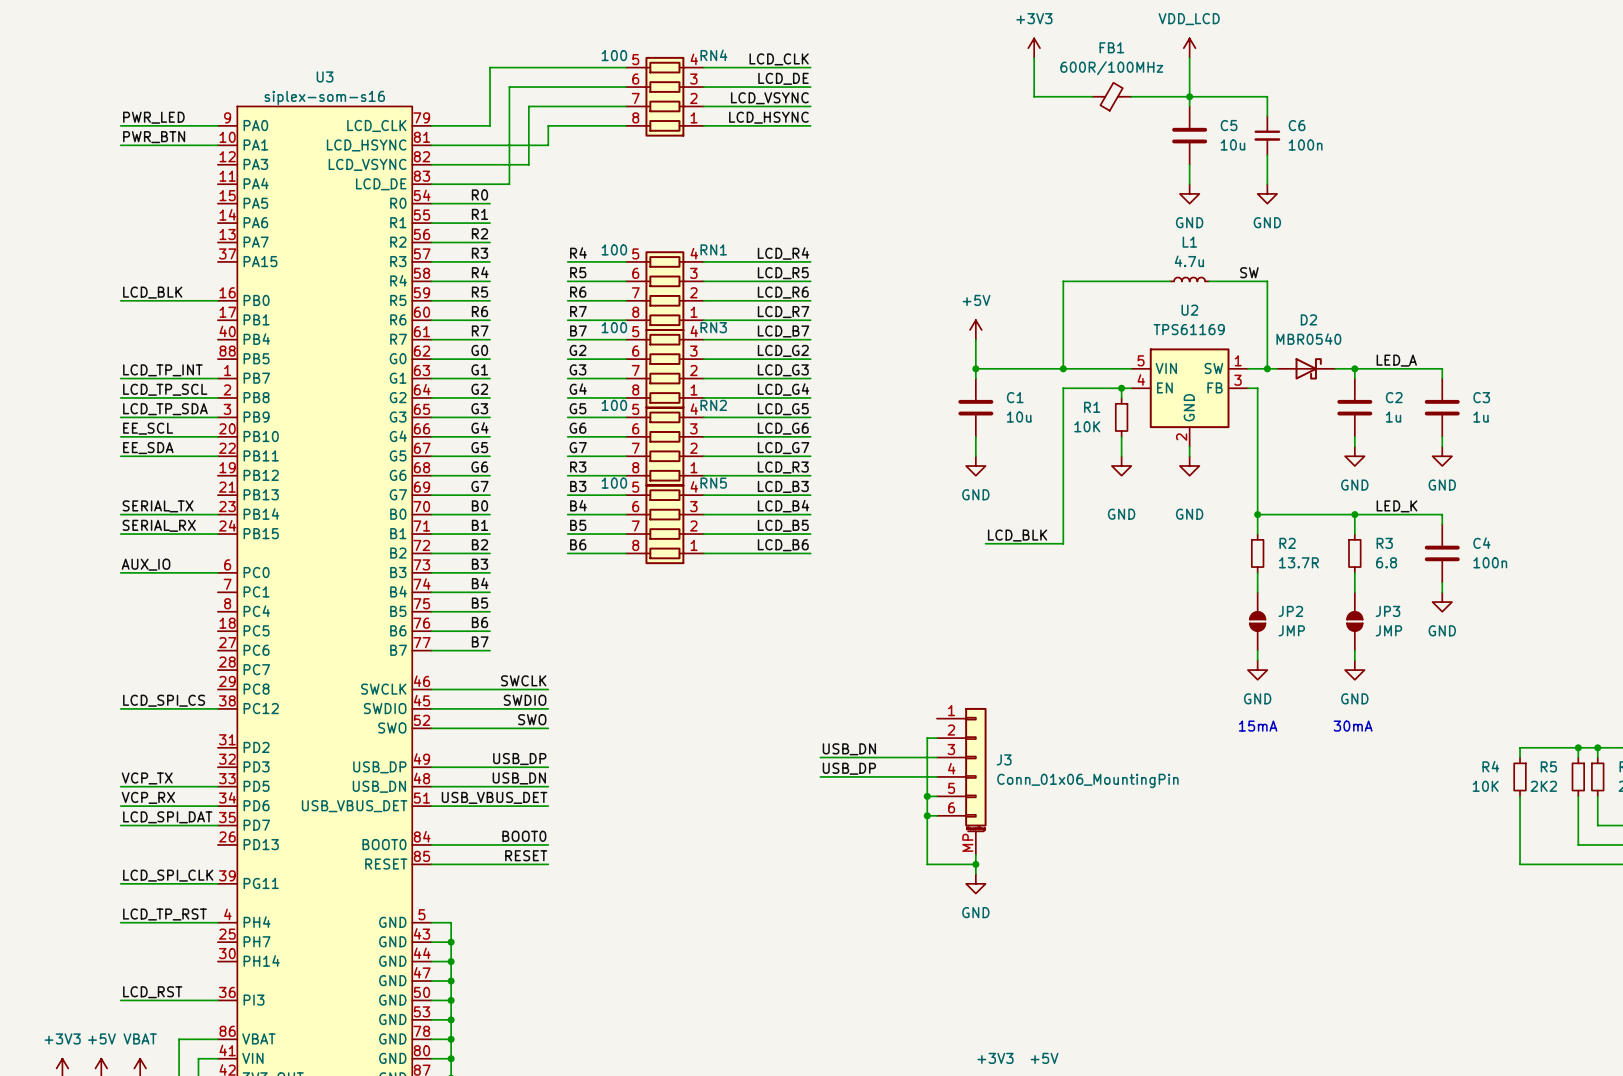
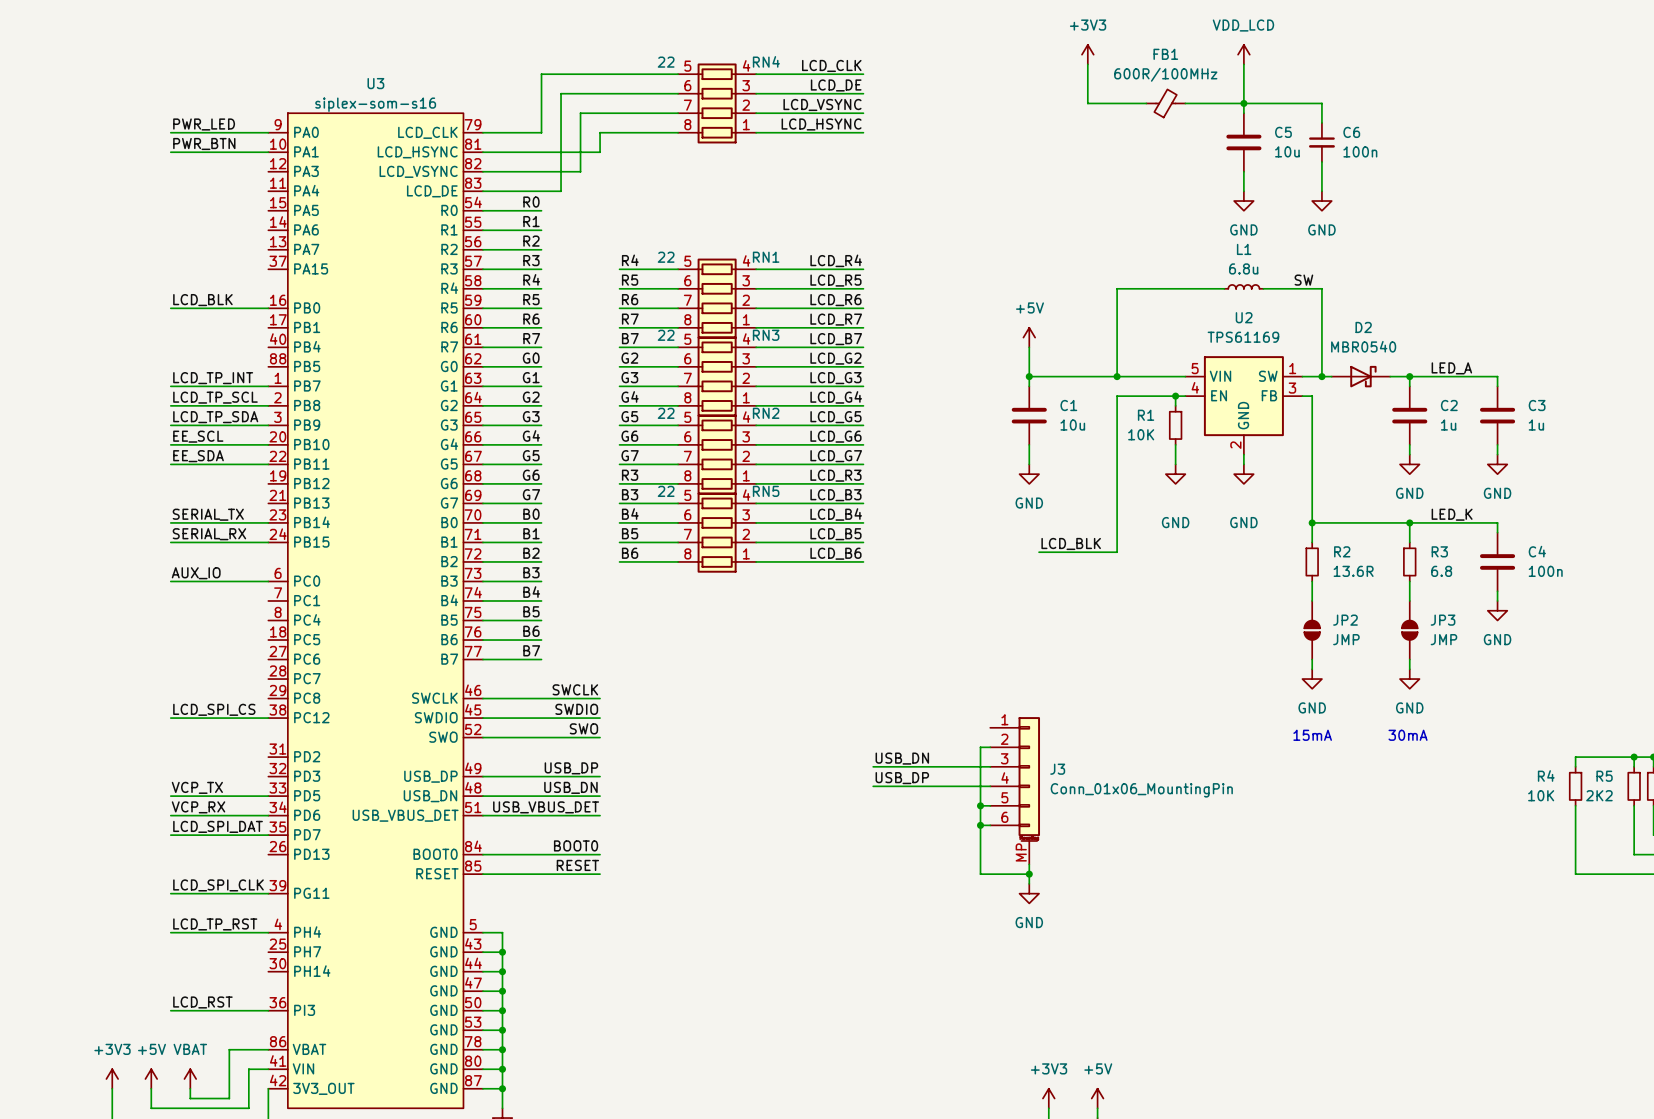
RN4 value: 100 (614, 55) -> 22 (666, 62)
RN1 value: 100 (614, 249) -> 22 (666, 257)
L1 value: 4.7u (1189, 261) -> 6.8u (1243, 268)
RN3 value: 100 (614, 327) -> 22 (666, 335)
RN2 value: 100 (614, 405) -> 22 (666, 413)
RN5 value: 100 (614, 483) -> 22 (666, 491)
R2 value: 13.7R (1298, 562) -> 13.6R (1353, 571)

